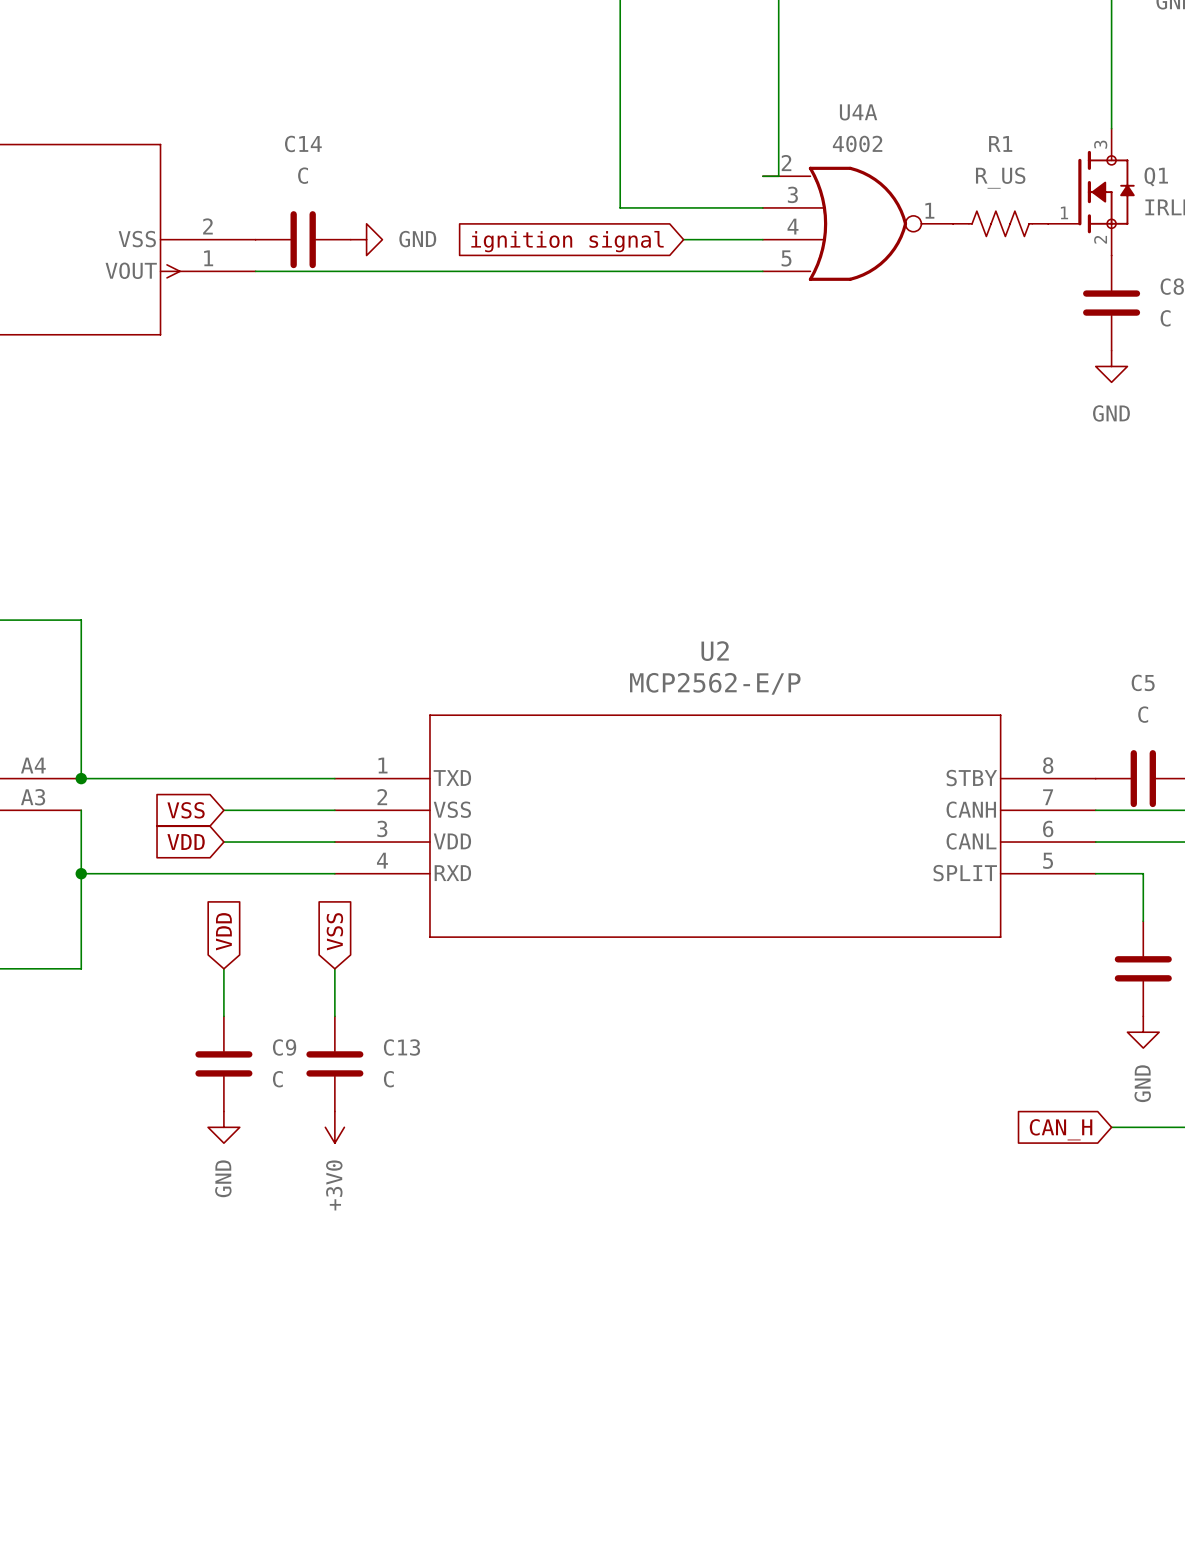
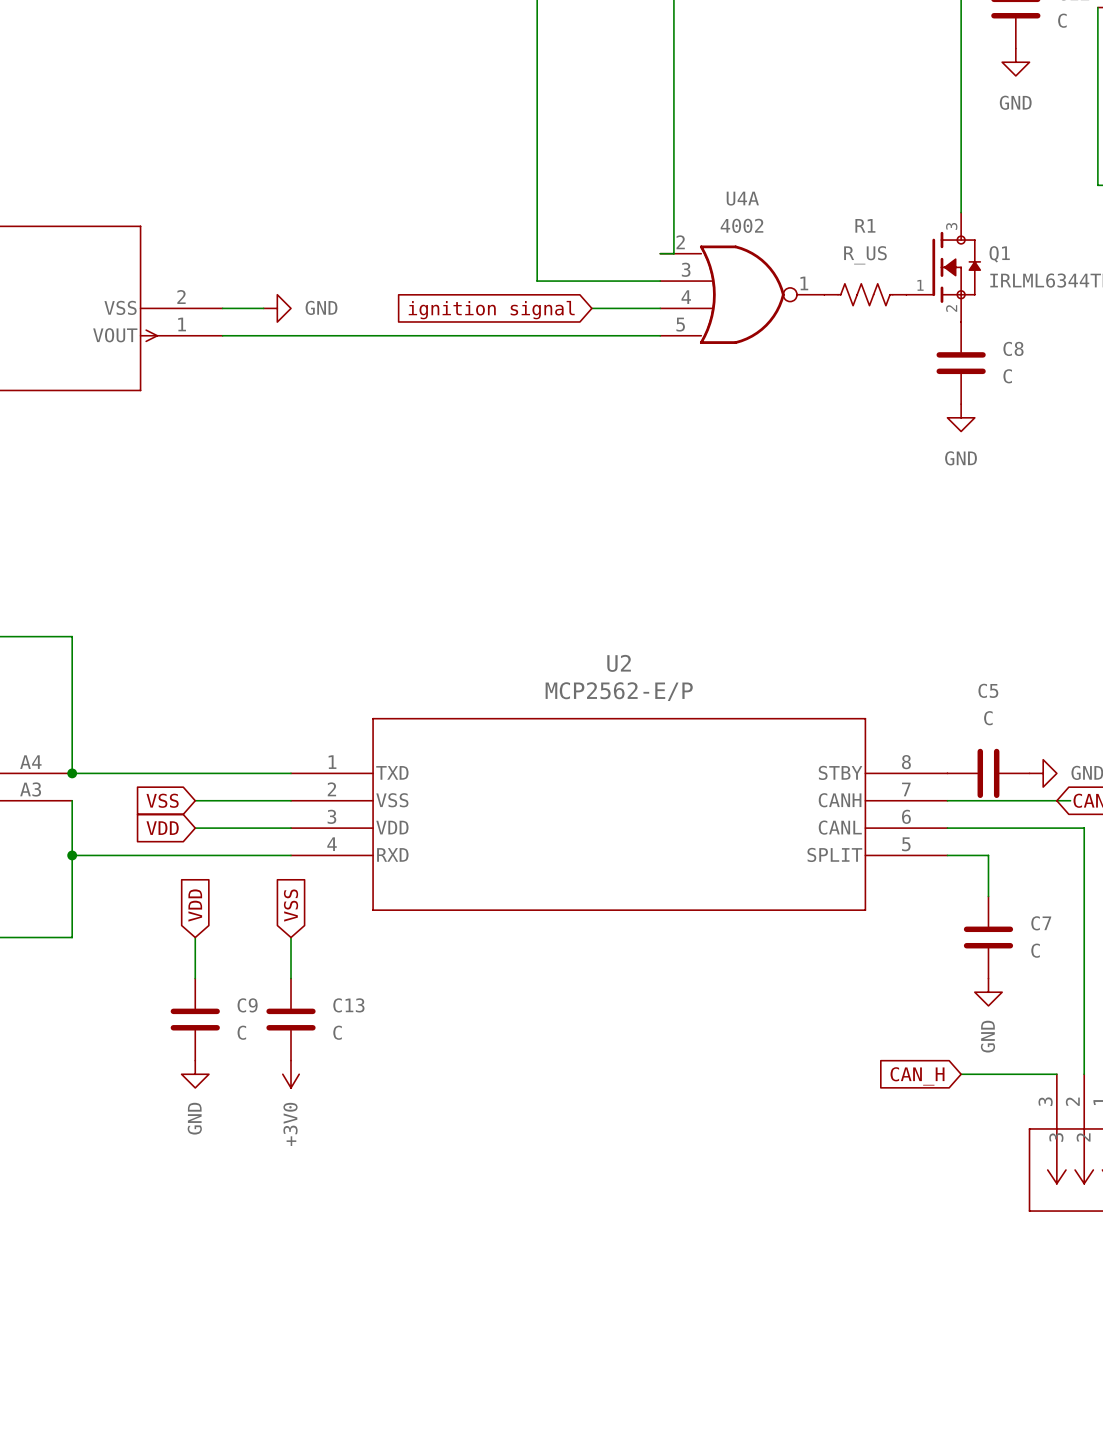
C14: C (303, 239) -> none
power symbol position: GND (366, 239) -> GND (277, 308)

